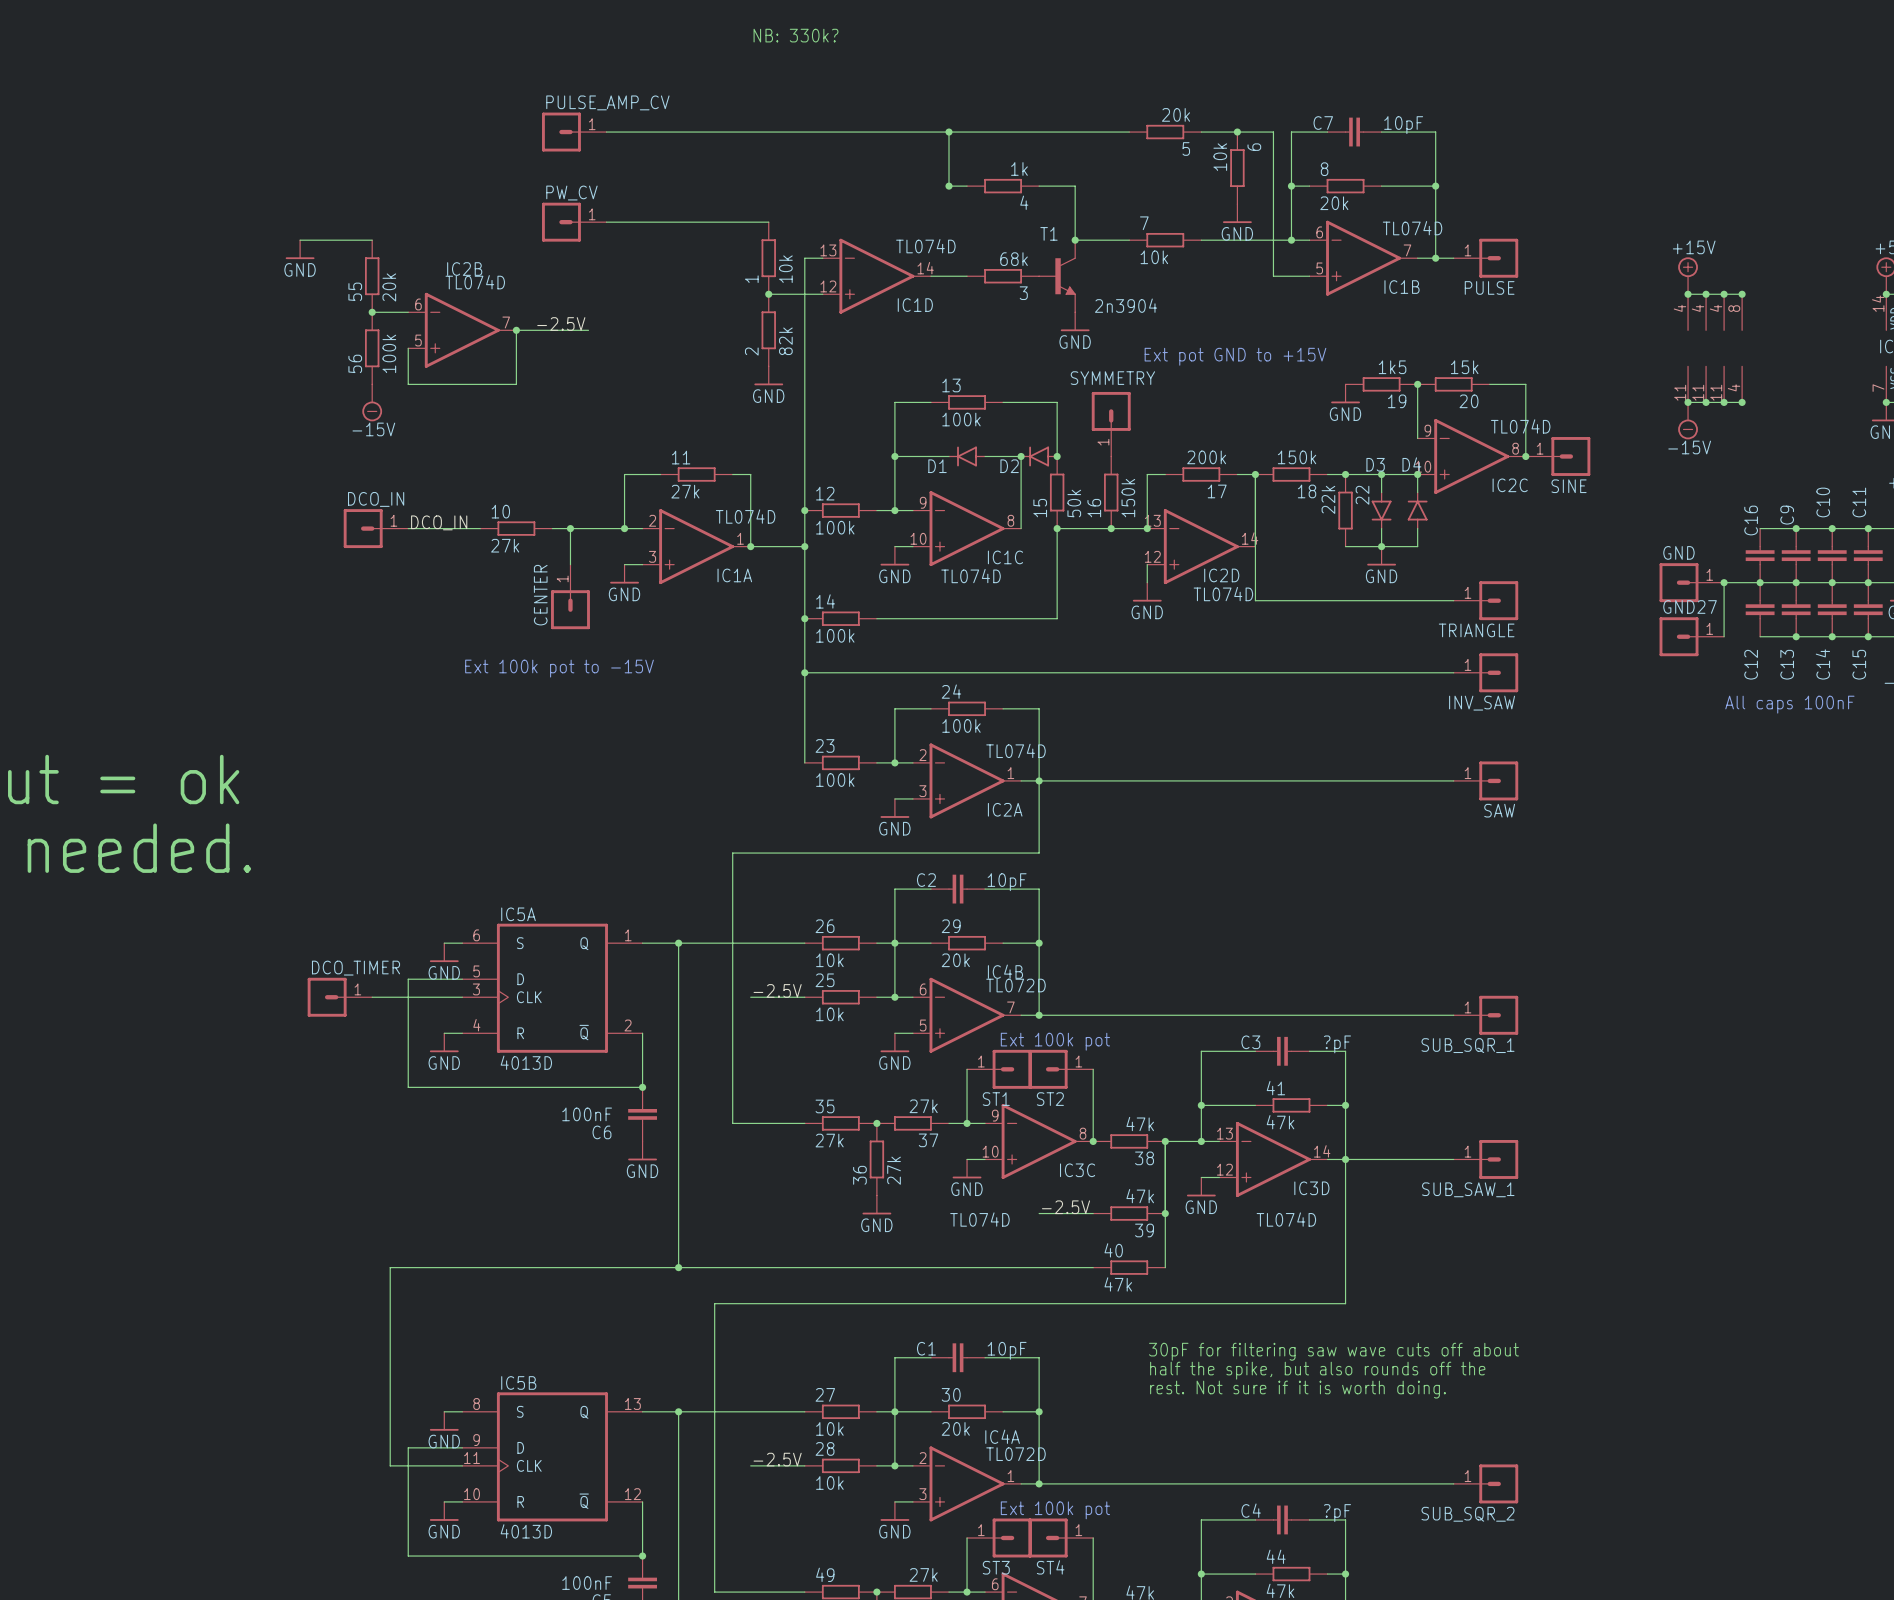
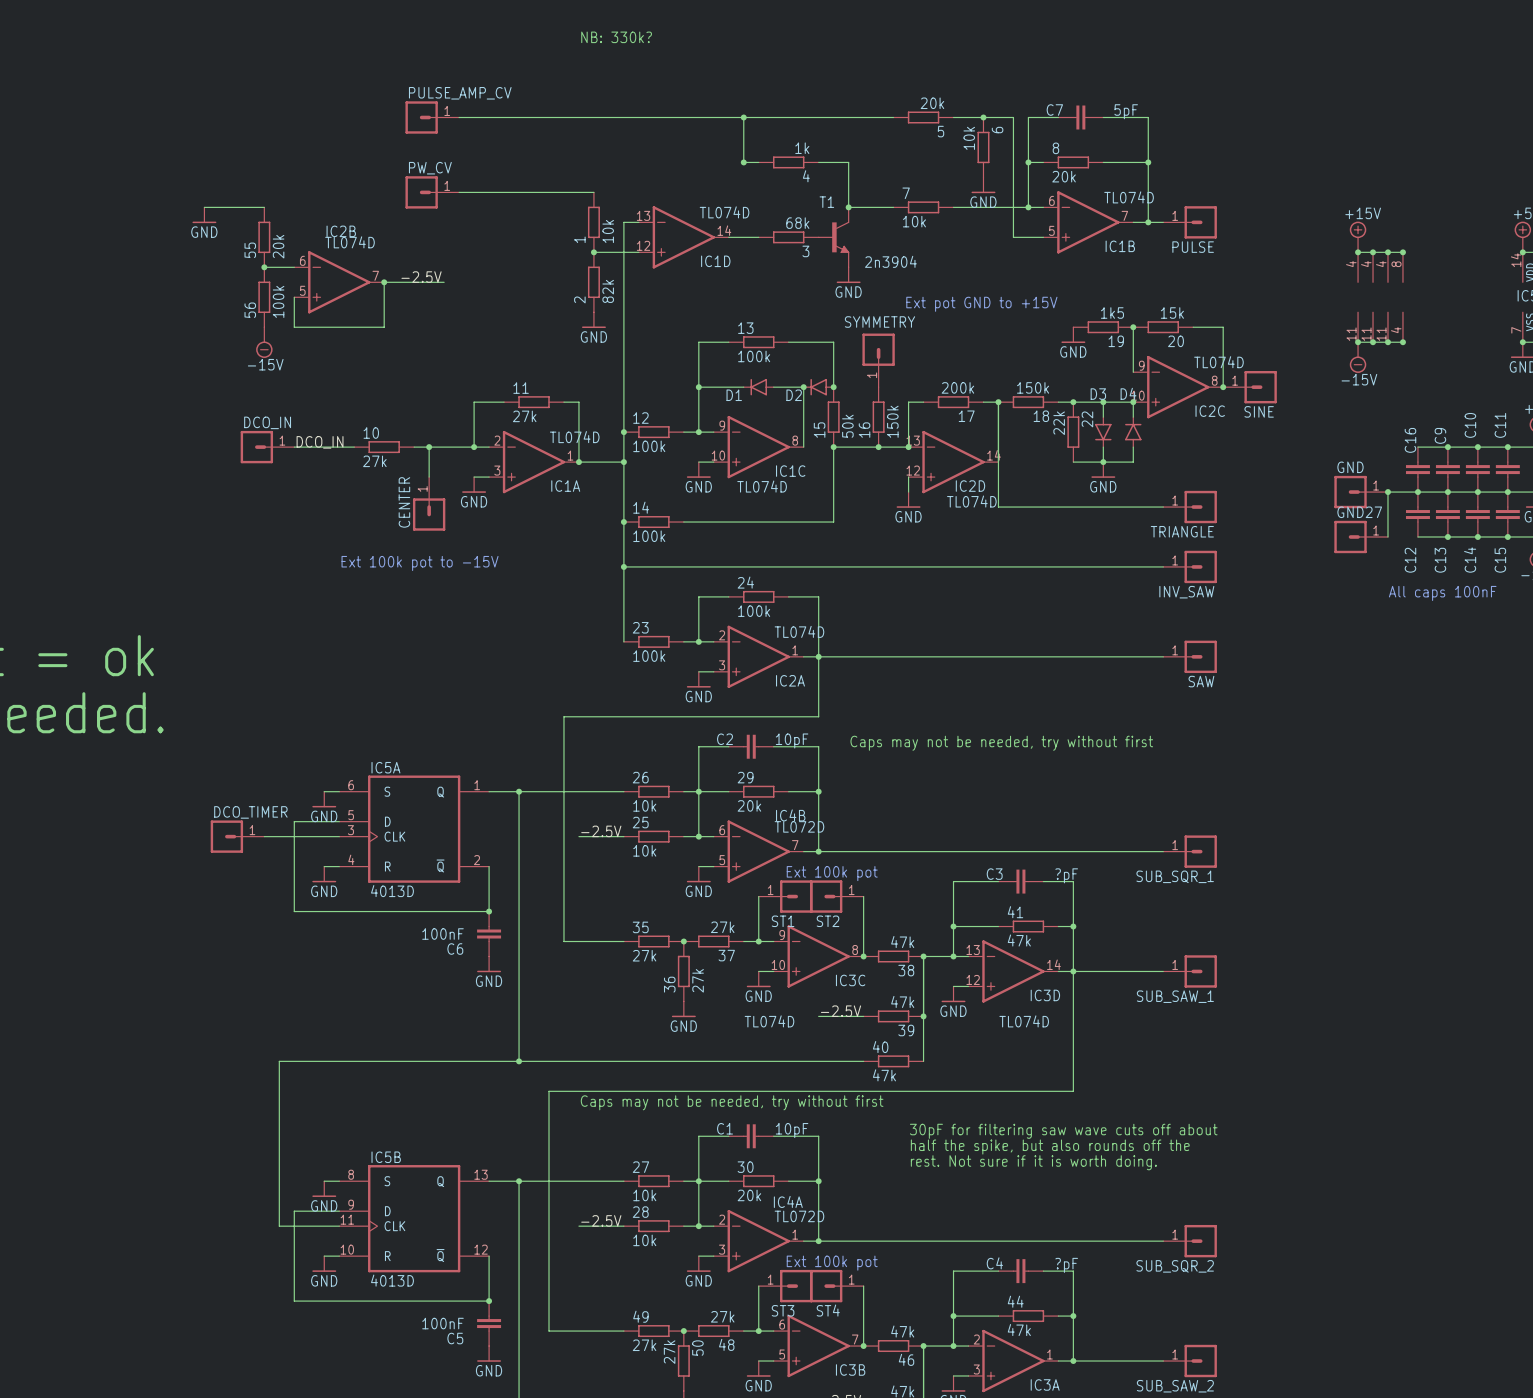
C7 value: 10pF (1403, 125) -> 5pF (1126, 111)
text: none -> Caps may not be needed, try without first (1001, 743)
text: none -> Caps may not be needed, try without first (732, 1102)

